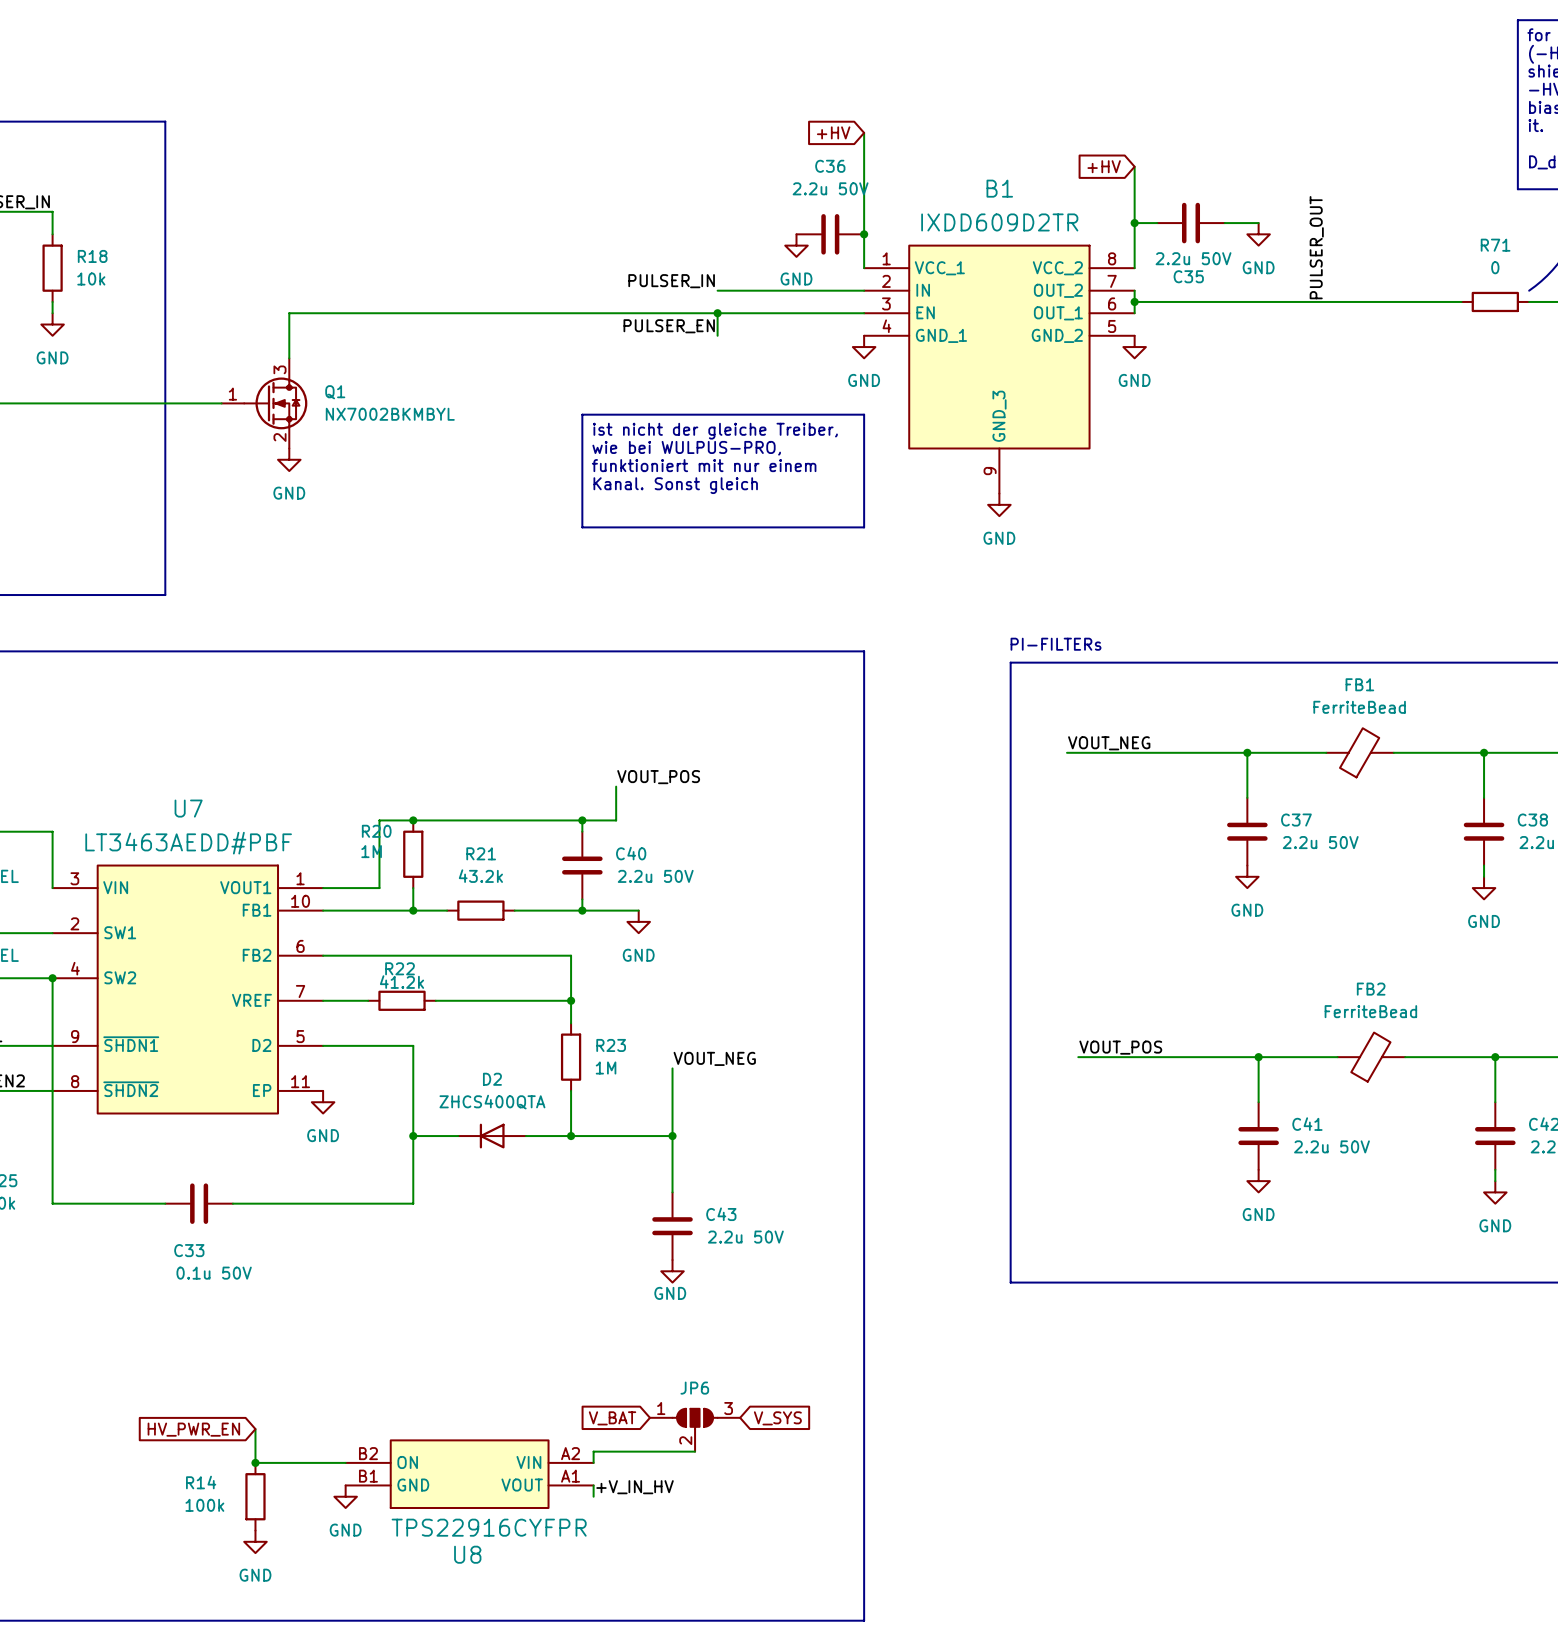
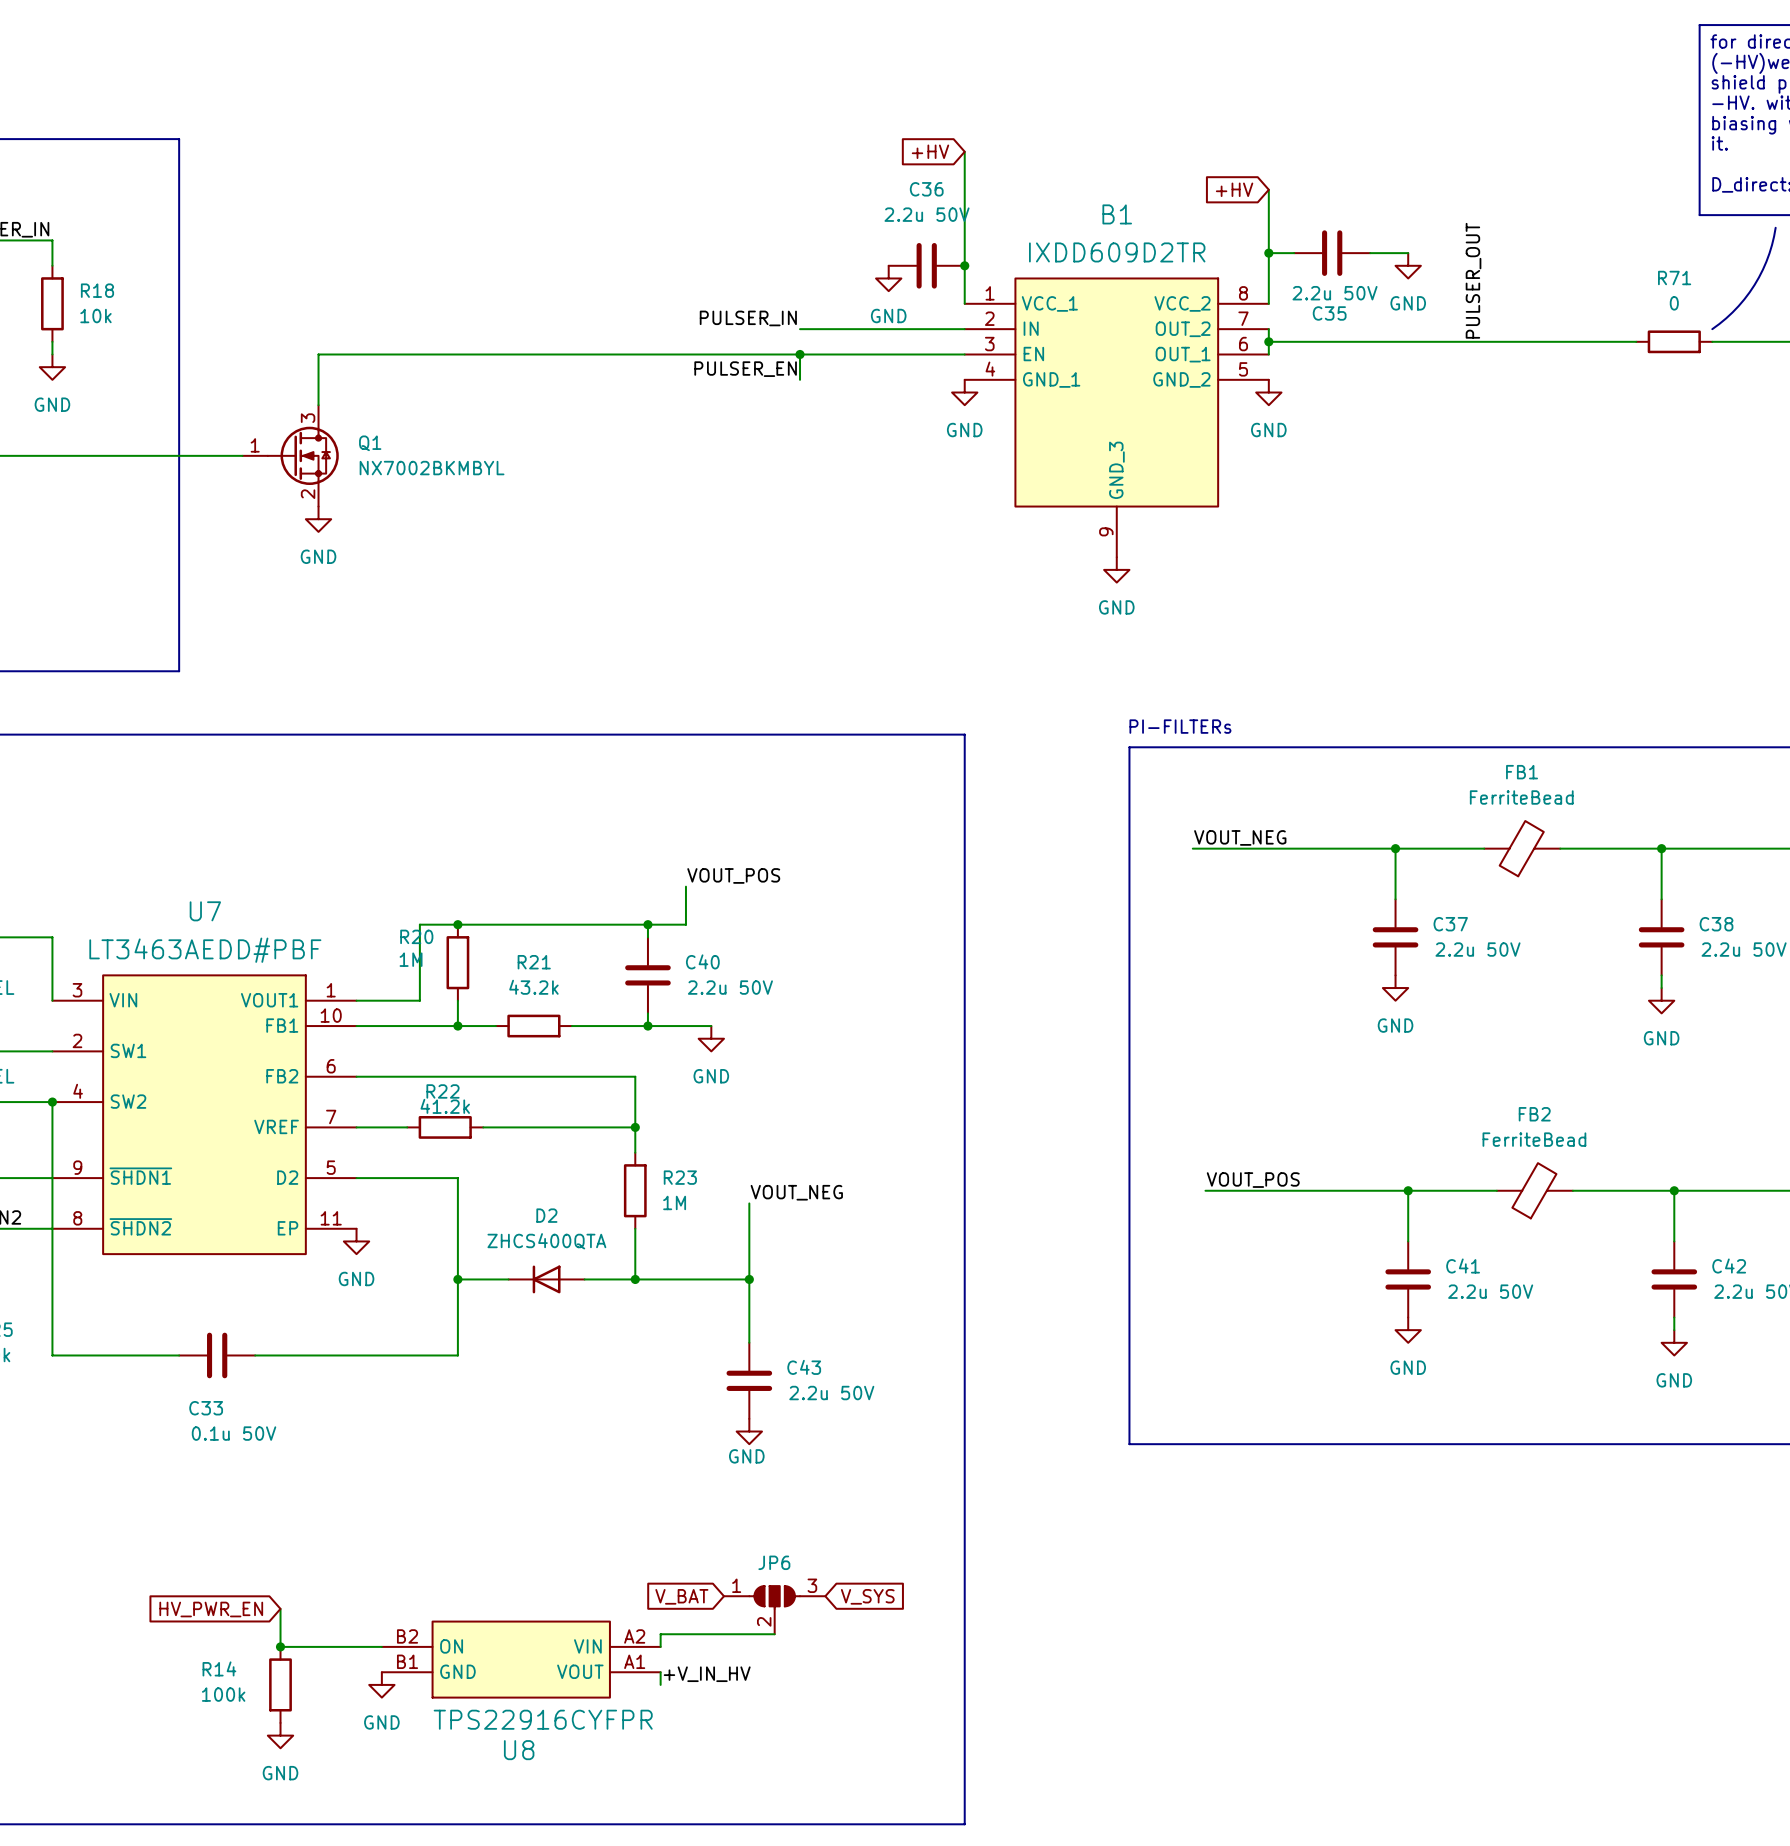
line: (582, 414) (864, 414) (864, 527) (582, 527) (582, 414) -> none
text: ist nicht der gleiche Treiber, (715, 431) -> none
text: wie bei WULPUS-PRO, (686, 448) -> none
text: funktioniert mit nur einem (704, 465) -> none
text: Kanal. Sonst gleich (675, 485) -> none

